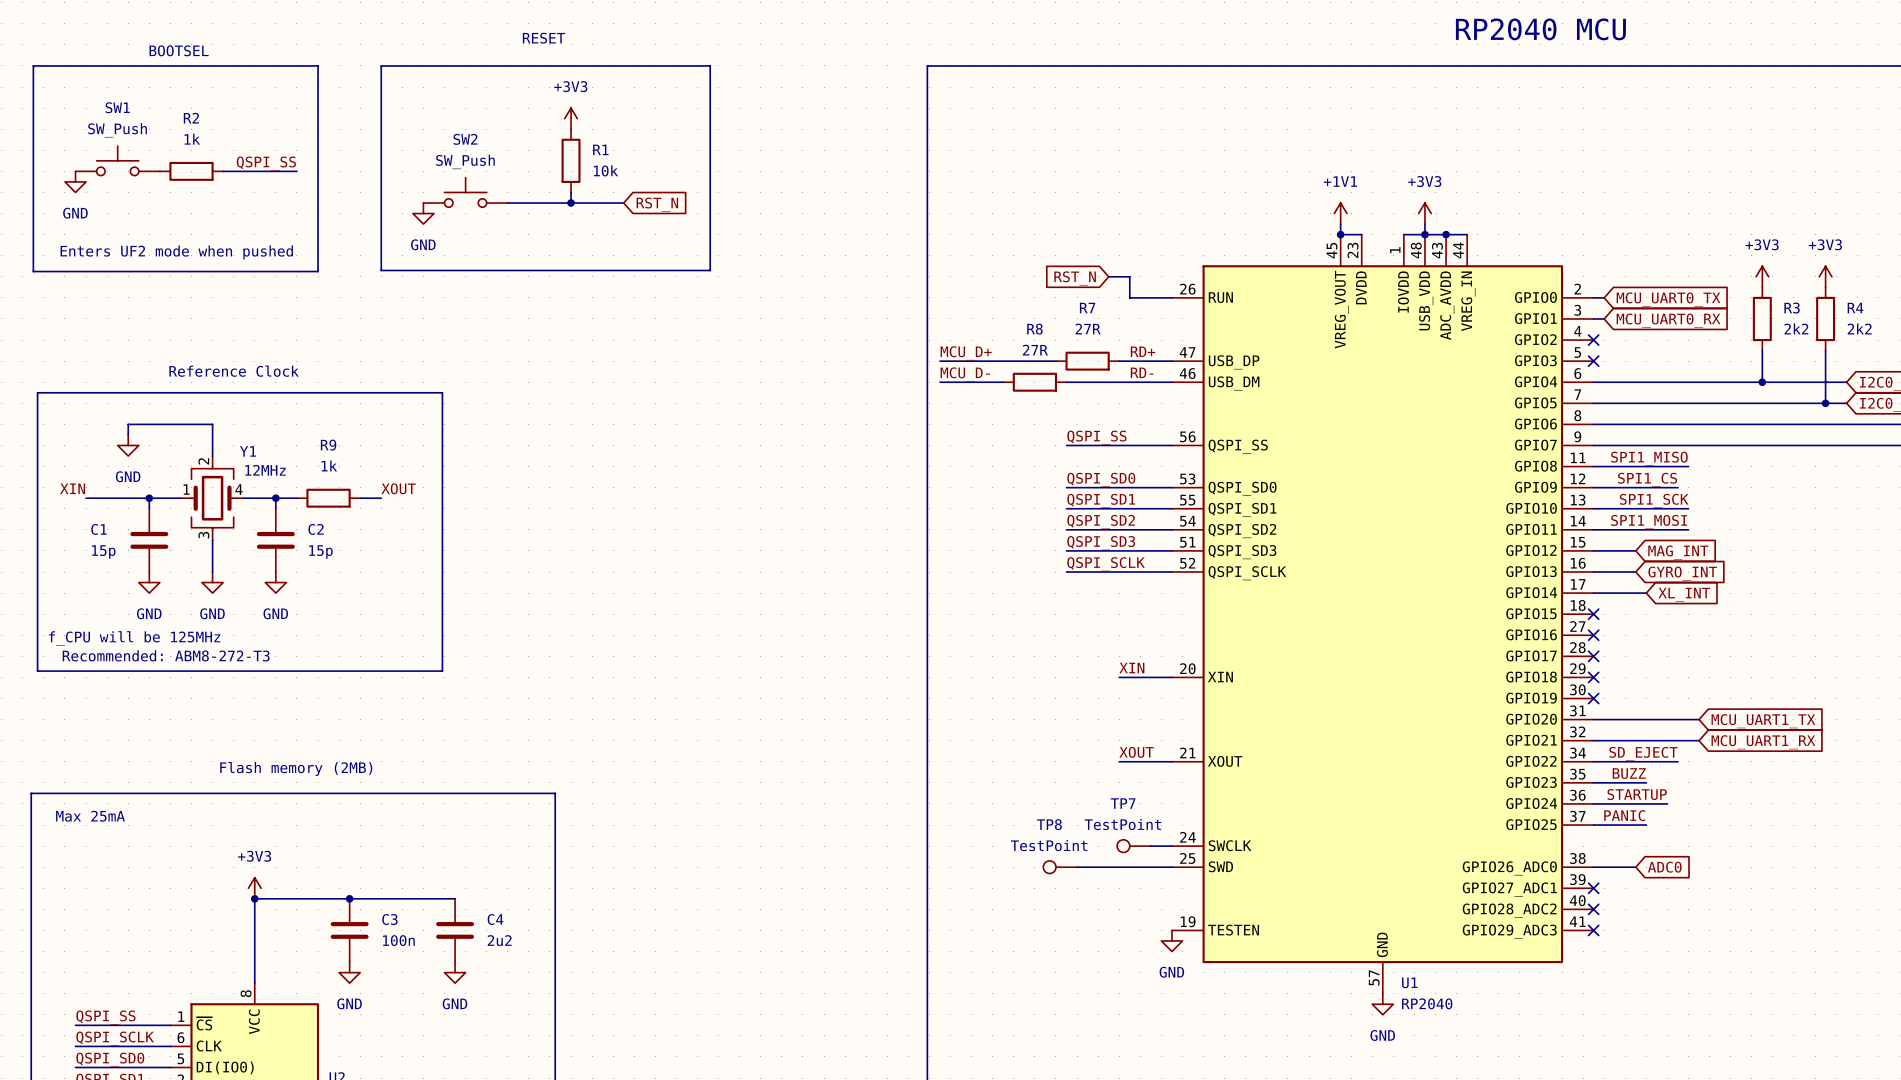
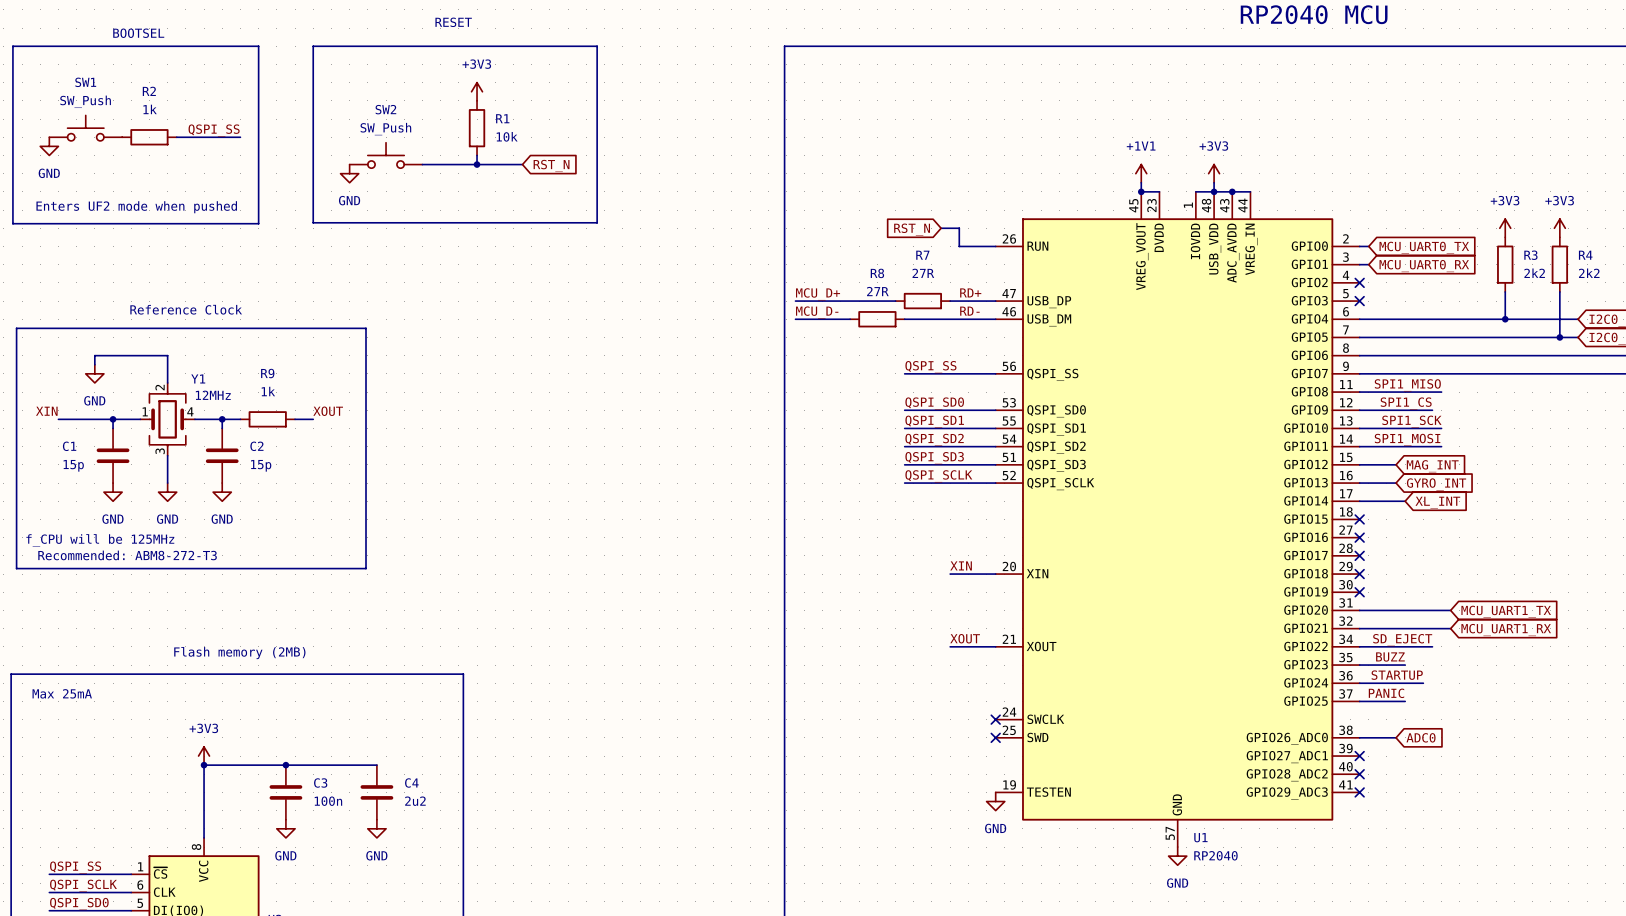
TP7: TestPoint (1134, 846) -> none
wire: (1150, 846) (1171, 846) -> none
no-connect mark: none -> (995, 719)
TP8: TestPoint (1060, 867) -> none
wire: (1077, 867) (1171, 867) -> none
no-connect mark: none -> (995, 737)

